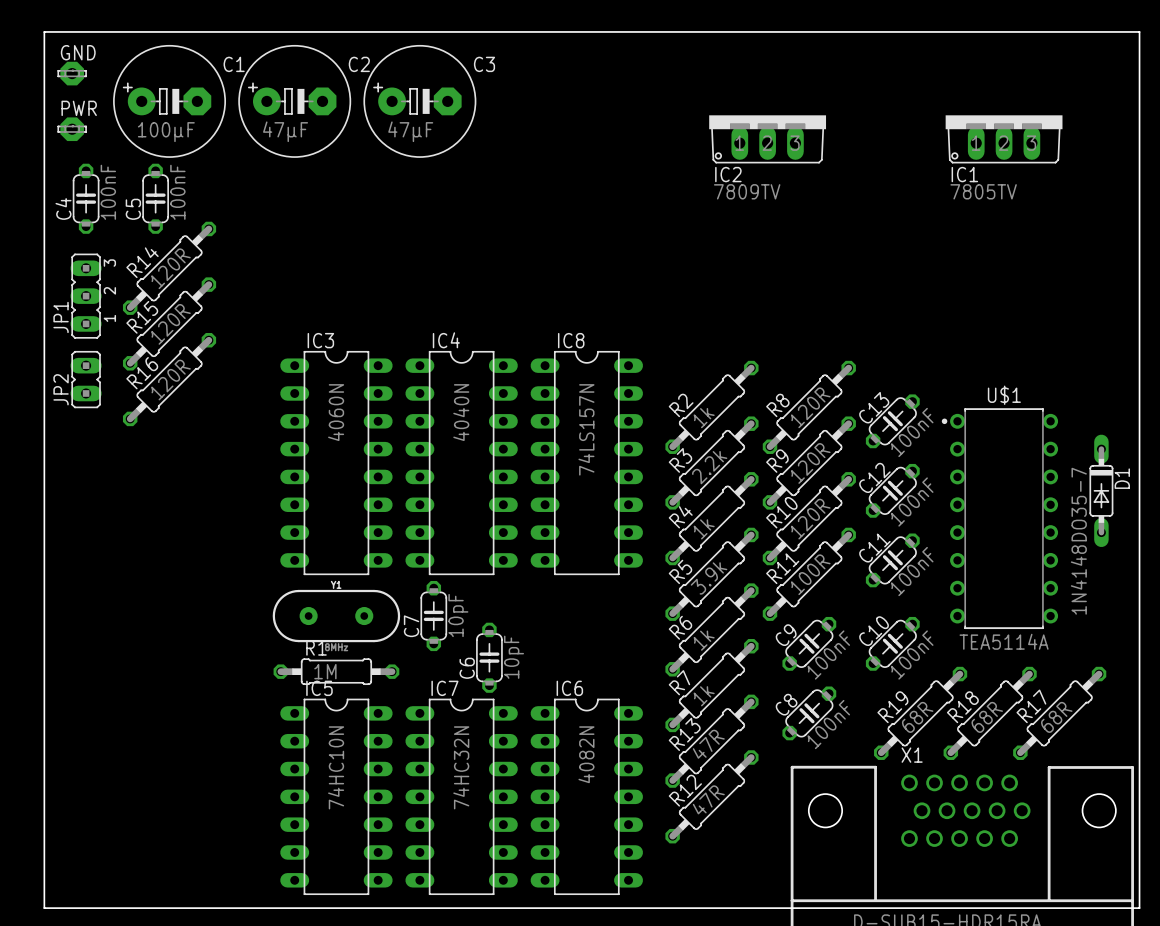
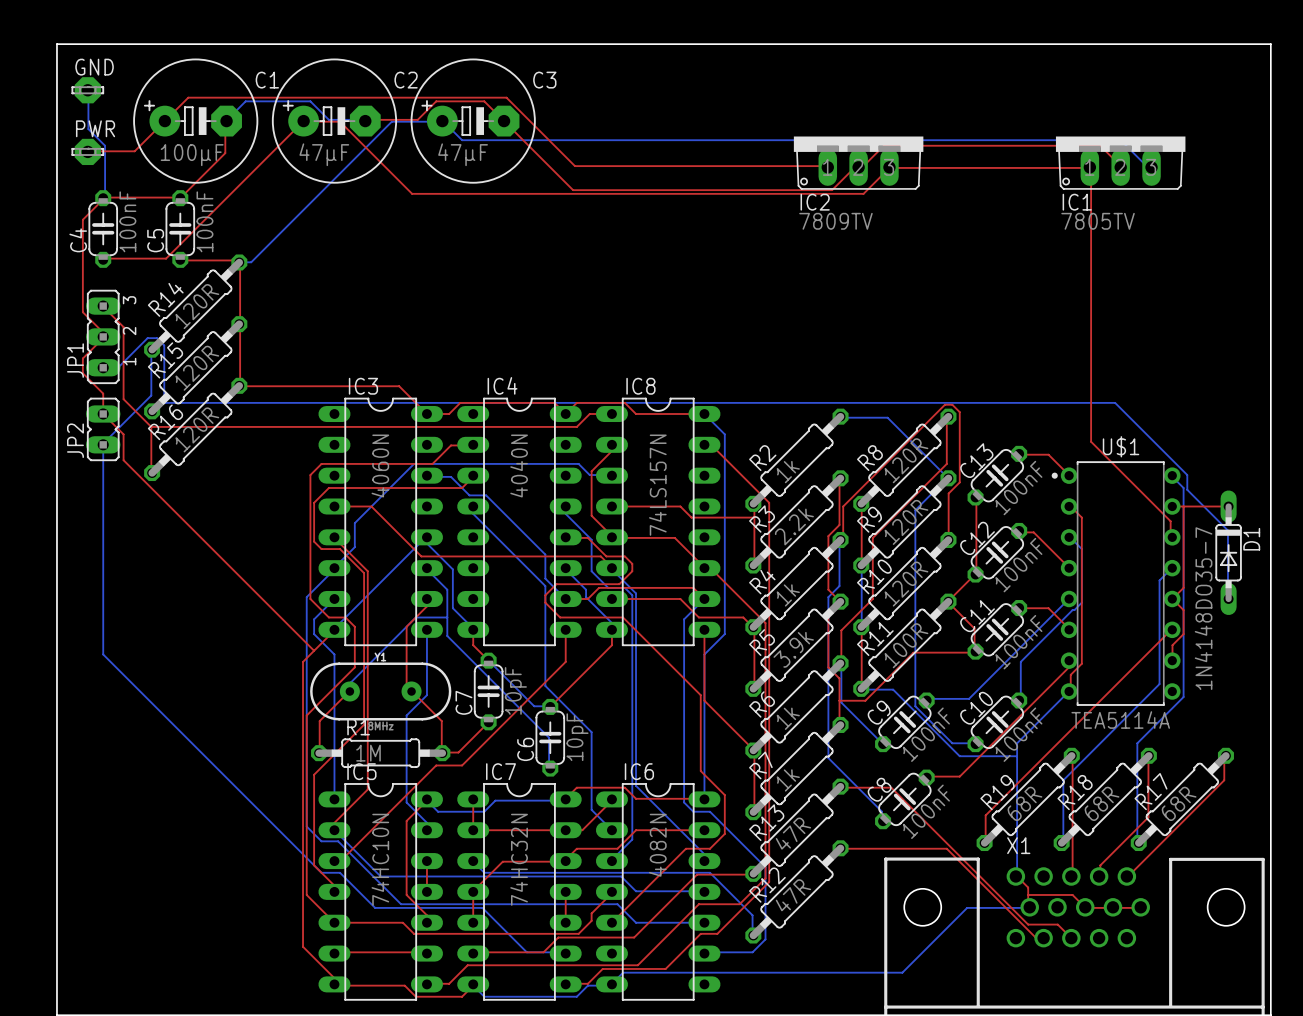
bottom track: none -> (87, 90) (88, 129) (105, 145) (105, 195) (103, 198)
top track: none -> (226, 121) (225, 153) (180, 198) (103, 197) (82, 219) (82, 312) (103, 332) (103, 338) (82, 358) (82, 373) (103, 393) (103, 414) (123, 434) (123, 460) (314, 650)
bottom track: none -> (226, 121) (245, 101) (310, 101) (328, 119) (365, 121)
top track: none -> (365, 121) (417, 119) (436, 101) (484, 101) (573, 190) (832, 190) (854, 167) (863, 166) (883, 145) (1100, 145) (1120, 167)
top track: none -> (87, 151) (134, 151) (188, 97) (506, 97) (574, 166) (827, 167)
top track: none -> (889, 167) (1091, 167) (1091, 441) (1170, 521) (1170, 536) (1172, 537)
top track: none -> (889, 167) (863, 193) (412, 193) (340, 121) (303, 121) (166, 258) (103, 259)
bottom track: none -> (1151, 167) (1146, 166) (1120, 140) (462, 140) (442, 121) (391, 121) (251, 262) (239, 262)
top track: none -> (180, 259) (236, 260) (240, 264) (240, 386) (399, 386) (426, 414) (449, 414) (460, 402) (554, 402) (565, 414) (576, 402) (624, 402) (636, 414) (704, 414)
top track: none -> (103, 306) (123, 327) (123, 399) (151, 426)
bottom track: none -> (152, 349) (151, 395) (103, 443) (103, 654) (321, 872) (340, 872) (375, 907) (482, 907) (526, 952) (565, 953)
bottom track: none -> (103, 367) (118, 367) (147, 338) (156, 338) (164, 345) (164, 402)
bottom track: none -> (152, 411) (160, 402) (1115, 402) (1187, 475) (1187, 489) (1227, 530) (1228, 598)
top track: none -> (611, 414) (589, 414) (576, 426) (151, 426)
bottom track: none -> (704, 414) (724, 434) (724, 634) (704, 654) (704, 799)
bottom track: none -> (840, 416) (887, 417) (948, 478) (915, 510) (915, 706) (952, 743) (975, 744)
top track: none -> (948, 416) (946, 417) (946, 463) (872, 537) (872, 598) (841, 630) (840, 663)
top track: none -> (151, 426) (152, 473)
top track: none -> (473, 444) (451, 445) (432, 463) (321, 463) (310, 475) (310, 598) (328, 617) (345, 617) (354, 626) (354, 667) (306, 715) (306, 894) (334, 922) (402, 922) (414, 933) (578, 933) (591, 920) (591, 913) (611, 891)
top track: none -> (611, 444) (611, 451) (591, 471) (591, 515) (611, 537) (674, 537) (704, 569) (711, 569) (765, 623) (765, 878) (739, 904) (698, 904) (637, 965) (467, 965) (449, 983) (426, 984)
top track: none -> (704, 444) (711, 445) (769, 502) (769, 882) (717, 933) (700, 933) (665, 968) (602, 968) (587, 983) (565, 984)
top track: none -> (1019, 453) (1048, 454) (1069, 475)
bottom track: none -> (426, 475) (451, 476) (469, 495) (486, 495) (545, 554) (545, 578) (565, 598)
top track: none -> (473, 475) (462, 488) (328, 488) (314, 502) (314, 541) (321, 549) (340, 549) (364, 573) (364, 724) (314, 774) (314, 865) (334, 885) (334, 891)
bottom track: none -> (611, 475) (589, 475) (578, 463) (414, 463) (354, 523) (354, 547) (306, 597) (306, 826) (321, 841) (338, 841) (401, 904) (617, 904) (636, 922) (704, 922)
bottom track: none -> (1172, 475) (1183, 488) (1183, 697) (1137, 743) (1138, 843)
top track: none -> (840, 478) (839, 524) (828, 536) (828, 589) (840, 601) (828, 613) (828, 667) (839, 678) (840, 724)
top track: none -> (975, 497) (976, 573) (948, 601) (974, 628) (975, 651) (913, 652) (865, 700) (839, 700)
top track: none -> (753, 503) (753, 565)
top track: none -> (861, 503) (861, 565)
top track: none -> (334, 506) (371, 506) (421, 556) (600, 556) (611, 568)
bottom track: none -> (473, 506) (473, 513) (545, 586) (545, 685) (591, 732) (591, 809) (611, 830)
bottom track: none -> (565, 506) (565, 513) (591, 539) (591, 571) (608, 587) (624, 587) (632, 595) (632, 839) (611, 861)
top track: none -> (611, 506) (680, 506) (691, 517) (754, 517)
top track: none -> (1069, 506) (1081, 517) (1081, 663) (1070, 674) (1070, 691) (1069, 691)
top track: none -> (1172, 506) (1228, 506)
top track: none -> (1183, 506) (1183, 587) (1172, 598) (1183, 610) (1183, 634) (1172, 645) (1172, 660)
top track: none -> (1019, 530) (1033, 532) (1069, 568)
top track: none -> (334, 537) (367, 571) (367, 789) (334, 822) (334, 830)
top track: none -> (565, 537) (587, 537) (606, 556) (624, 556) (632, 563) (632, 571) (619, 584) (556, 584) (545, 595) (545, 602) (560, 617) (623, 617) (700, 695) (700, 771) (724, 795) (724, 833) (710, 848) (685, 848) (611, 922)
bottom track: none -> (1069, 537) (1081, 549) (1081, 602) (1020, 661) (1020, 698) (1019, 700)
top track: none -> (840, 539) (843, 537) (843, 506) (944, 404) (952, 404) (959, 412) (959, 482) (948, 493) (948, 539)
bottom track: none -> (840, 539) (839, 586) (828, 597) (828, 758) (882, 811) (883, 821)
bottom track: none -> (861, 565) (861, 627)
bottom track: none -> (426, 568) (447, 589) (447, 635) (549, 737) (550, 768)
bottom track: none -> (565, 568) (586, 589) (586, 597) (611, 623) (611, 629)
bottom track: none -> (611, 568) (636, 593) (636, 785) (704, 854) (704, 861)
bottom track: none -> (1172, 568) (1159, 580) (1159, 684) (1063, 780) (1063, 841) (1061, 843)
bottom track: none -> (334, 598) (314, 619) (314, 634) (334, 654) (334, 799)
top track: none -> (426, 598) (426, 606) (406, 626) (406, 687) (441, 721) (442, 753) (458, 752) (488, 722)
top track: none -> (565, 598) (587, 598) (599, 587) (693, 587) (704, 598)
top track: none -> (611, 598) (680, 598) (698, 617) (743, 617) (754, 628) (753, 688)
bottom track: none -> (704, 598) (684, 619) (684, 802) (693, 811) (710, 811) (765, 867) (765, 939) (752, 952) (704, 953)
bottom track: none -> (1068, 598) (969, 698) (928, 698) (926, 700)
top track: none -> (1019, 608) (1048, 608) (1069, 629)
bottom track: none -> (447, 617) (415, 617) (351, 682) (349, 691)
top track: none -> (861, 627) (861, 688)
top track: none -> (334, 629) (303, 661) (303, 946) (334, 978) (334, 985) (404, 985) (415, 996) (462, 996) (473, 984)
bottom track: none -> (334, 629) (334, 628) (426, 536) (426, 537) (423, 539) (452, 569) (452, 608) (473, 629)
bottom track: none -> (426, 629) (426, 695) (406, 715) (406, 802) (426, 822) (426, 830)
top track: none -> (473, 629) (473, 645) (488, 660)
top track: none -> (565, 629) (565, 661) (462, 765) (436, 765) (341, 859) (334, 861)
top track: none -> (611, 629) (611, 645) (550, 706)
top track: none -> (704, 629) (704, 700) (754, 750) (753, 812)
top track: none -> (1172, 629) (985, 815) (984, 843)
bottom track: none -> (488, 660) (534, 706) (550, 706)
top track: none -> (1069, 660) (1068, 667) (959, 776) (926, 777)
bottom track: none -> (840, 663) (841, 702) (883, 744)
bottom track: none -> (861, 688) (893, 689) (959, 756) (1017, 756)
top track: none -> (349, 691) (319, 721) (319, 753)
bottom track: none -> (1068, 691) (1017, 743) (1015, 876)
top track: none -> (1071, 755) (1071, 876)
top track: none -> (1148, 755) (1148, 817) (1100, 865) (1099, 876)
top track: none -> (1225, 755) (1224, 756) (1224, 780) (1126, 876)
top track: none -> (840, 786) (891, 787) (1028, 924) (1057, 924) (1071, 938)
top track: none -> (426, 799) (406, 820) (406, 894) (426, 915) (426, 922)
bottom track: none -> (426, 799) (438, 811) (484, 811) (495, 800) (565, 799)
top track: none -> (473, 799) (473, 830) (582, 830) (611, 799)
top track: none -> (565, 799) (576, 787) (624, 787) (636, 798) (704, 799)
bottom track: none -> (334, 830) (380, 876) (621, 876) (636, 891) (704, 891)
top track: none -> (704, 830) (636, 830) (617, 848) (576, 848) (565, 861) (502, 861) (473, 891) (473, 922)
top track: none -> (840, 848) (946, 848) (1035, 937) (1043, 938)
top track: none -> (426, 861) (426, 891)
bottom track: none -> (473, 861) (484, 872) (710, 872) (752, 915) (753, 935)
top track: none -> (753, 873) (697, 874) (634, 937) (558, 937) (543, 952) (473, 953)
top track: none -> (1015, 876) (1028, 887) (1029, 907)
top track: none -> (565, 891) (565, 922)
top track: none -> (1028, 894) (1072, 894) (1085, 907) (1140, 907)
bottom track: none -> (1029, 907) (967, 907) (902, 972) (623, 972) (611, 985) (587, 985) (576, 996) (484, 996) (473, 984)
top track: none -> (334, 953) (426, 953)

